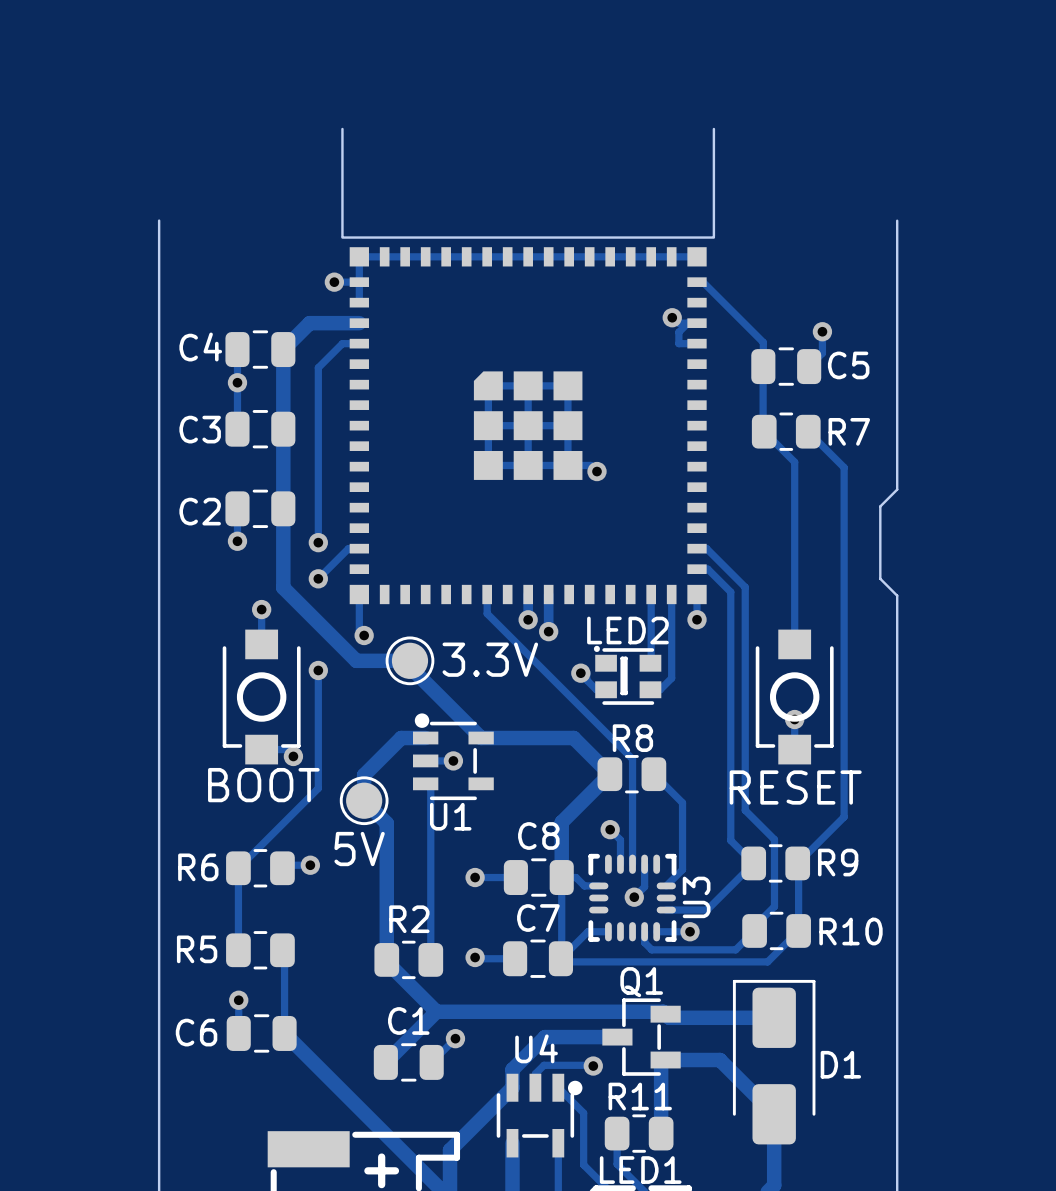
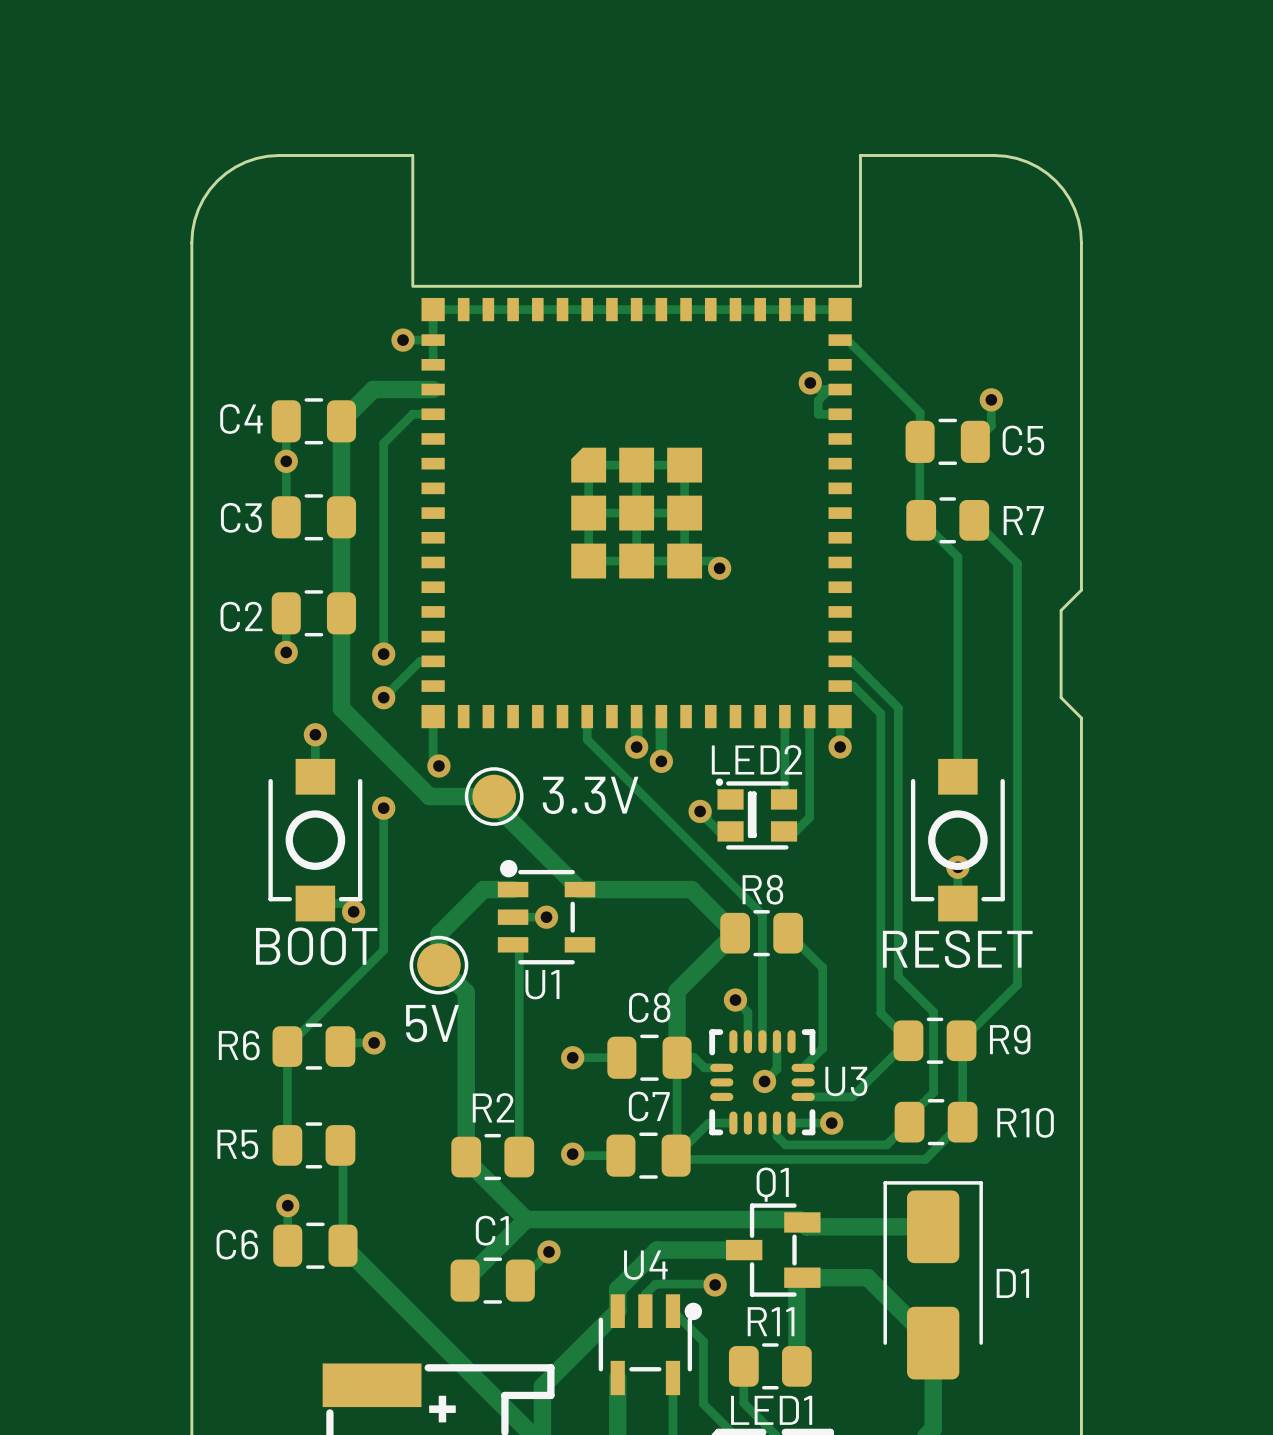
board edge: none -> (412, 155) (267, 156) (235, 167) (209, 189) (198, 209) (192, 231) (191, 265)
board edge: none -> (860, 155) (1005, 156) (1037, 167) (1063, 189) (1074, 209) (1080, 231) (1081, 266)
U3 name rotation: 0° (696, 897) -> 90° clockwise (846, 1081)

